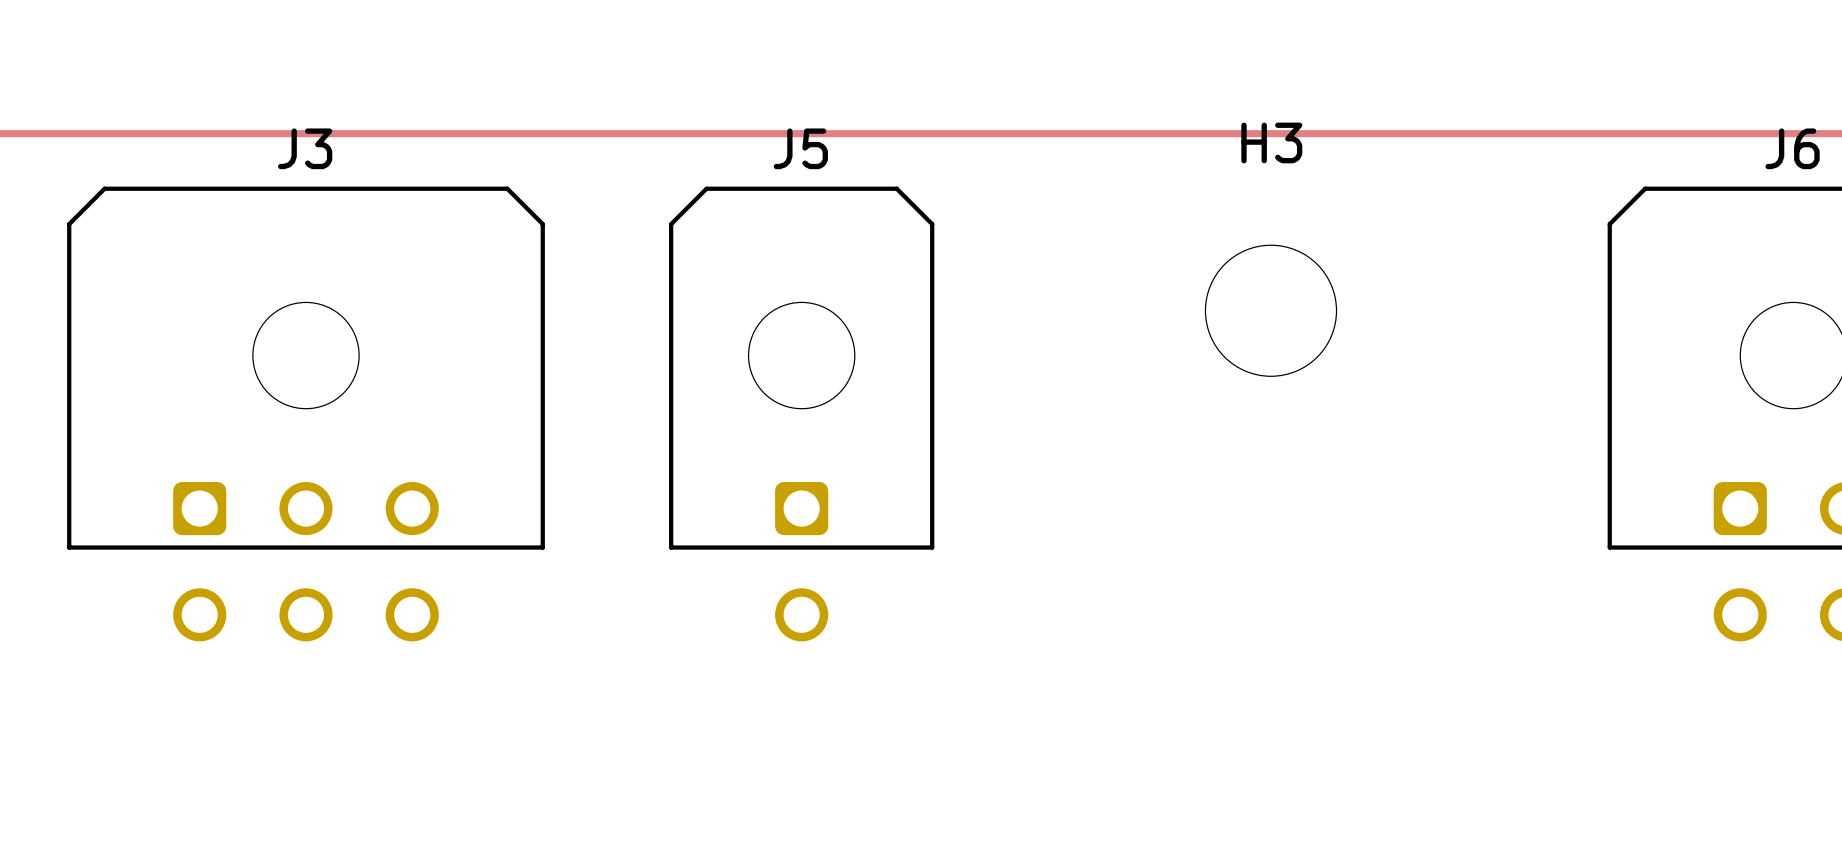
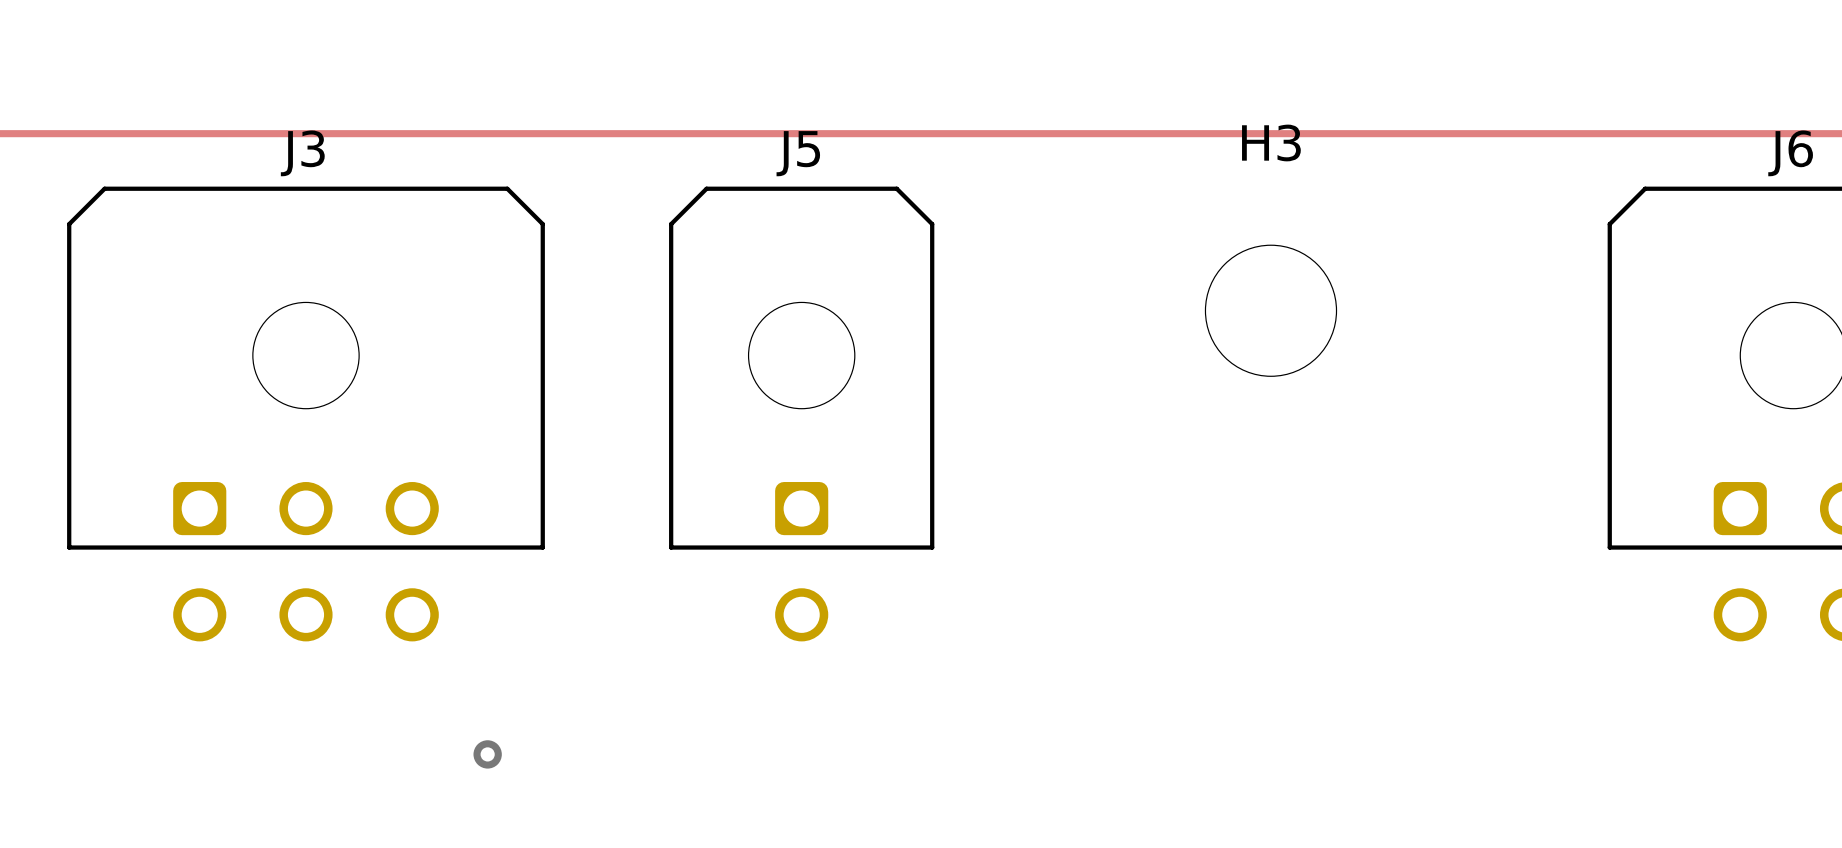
via: none -> (487, 754)

